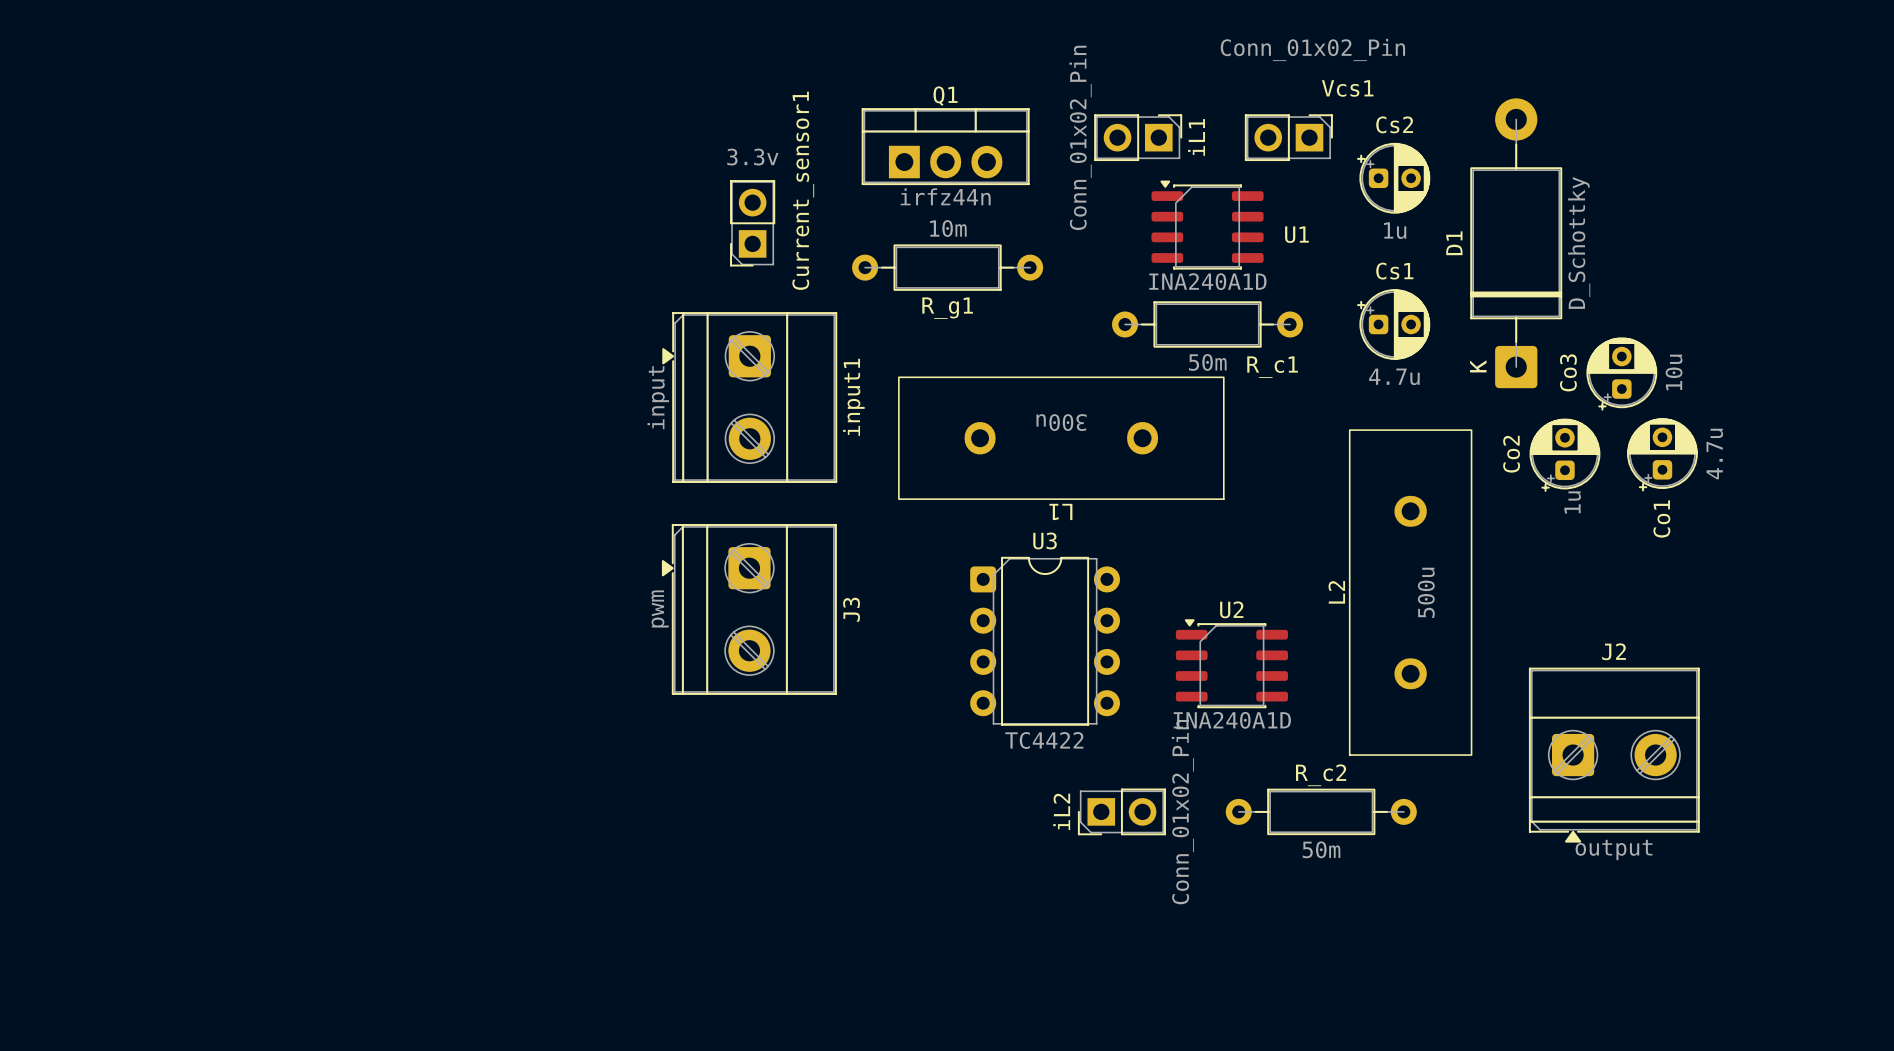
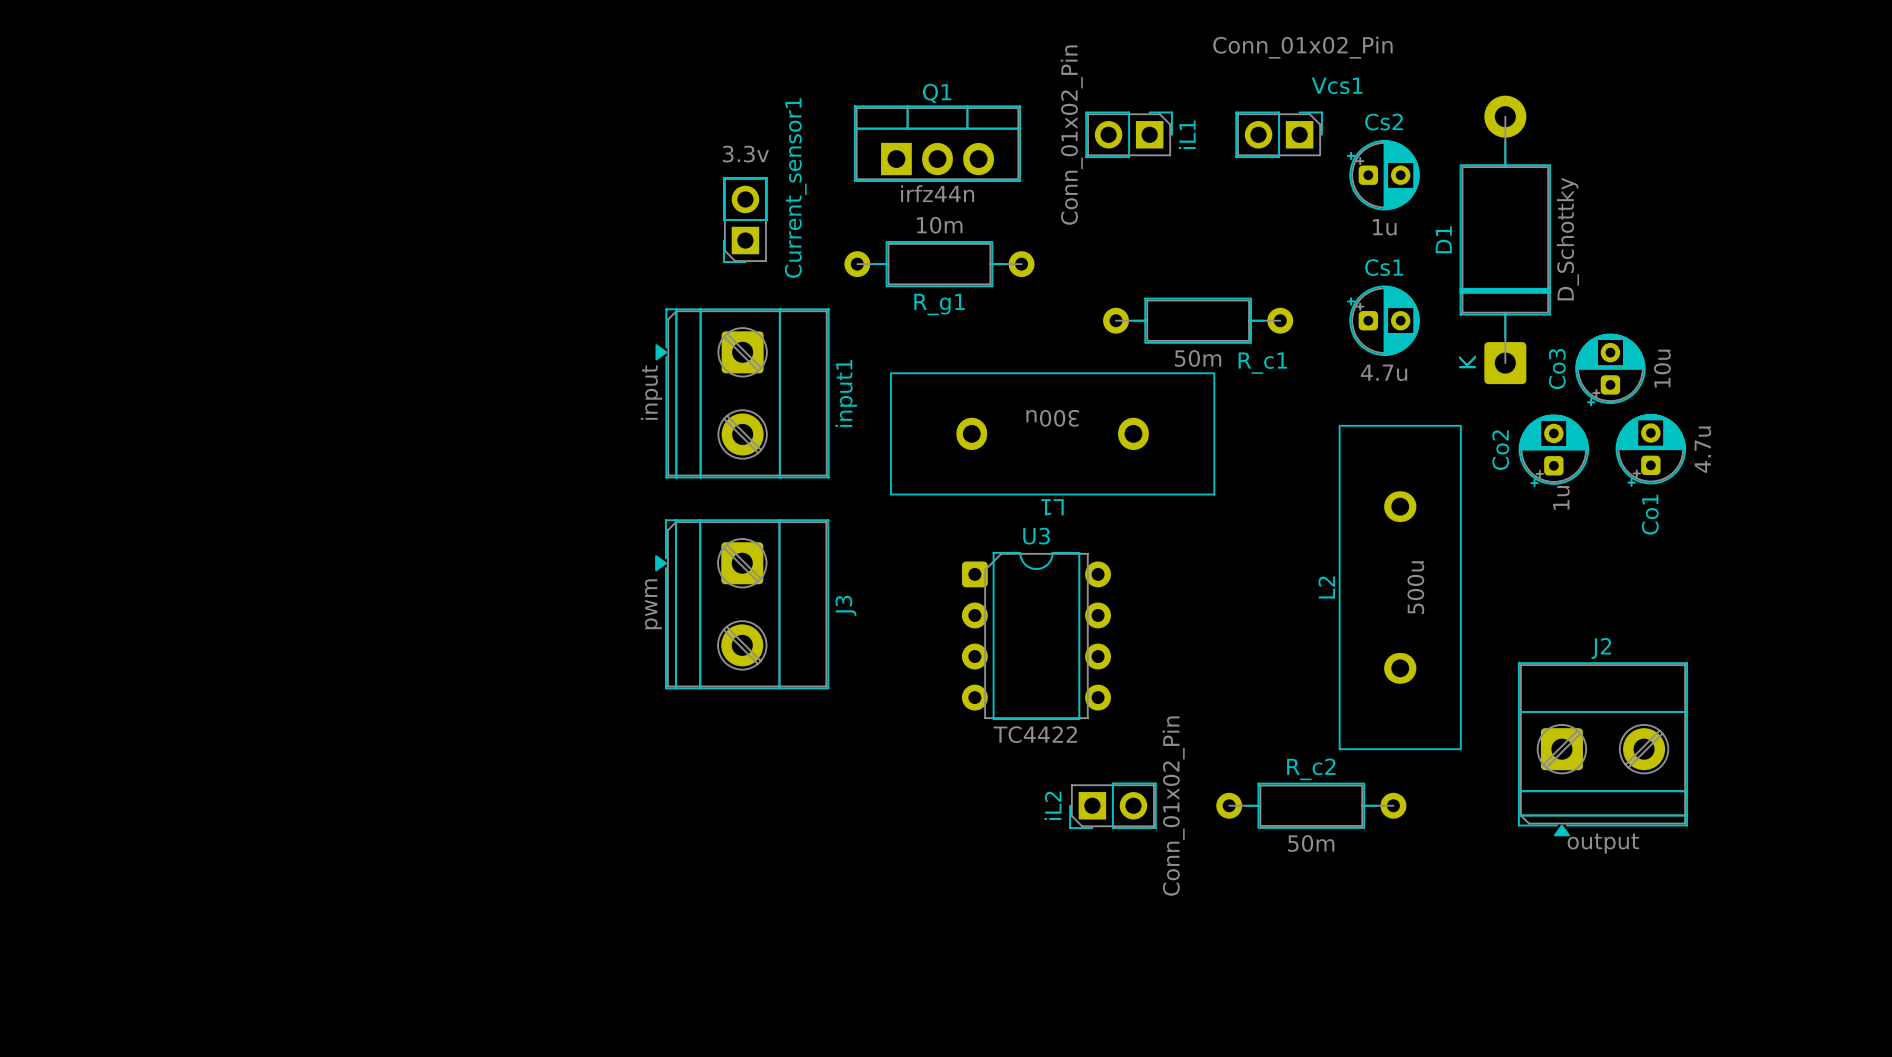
U1: INA240A1D (1207, 225) -> none
U2: INA240A1D (1231, 663) -> none

